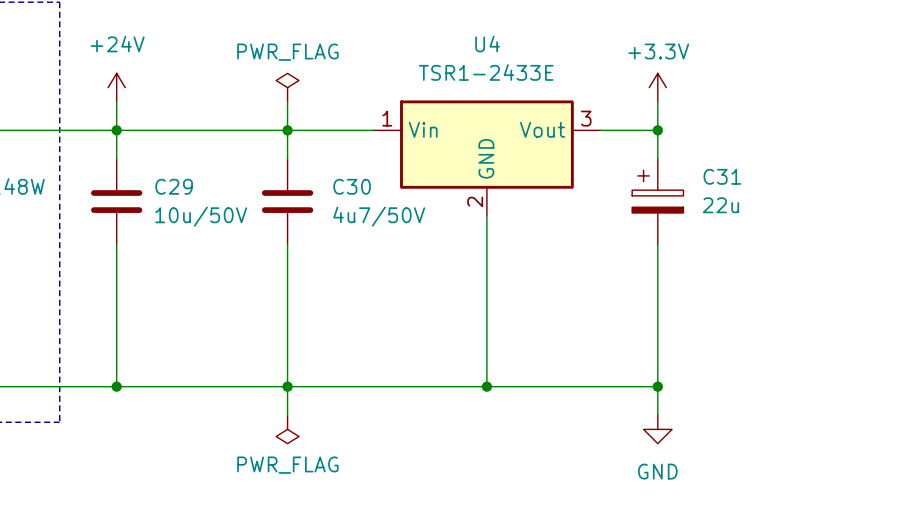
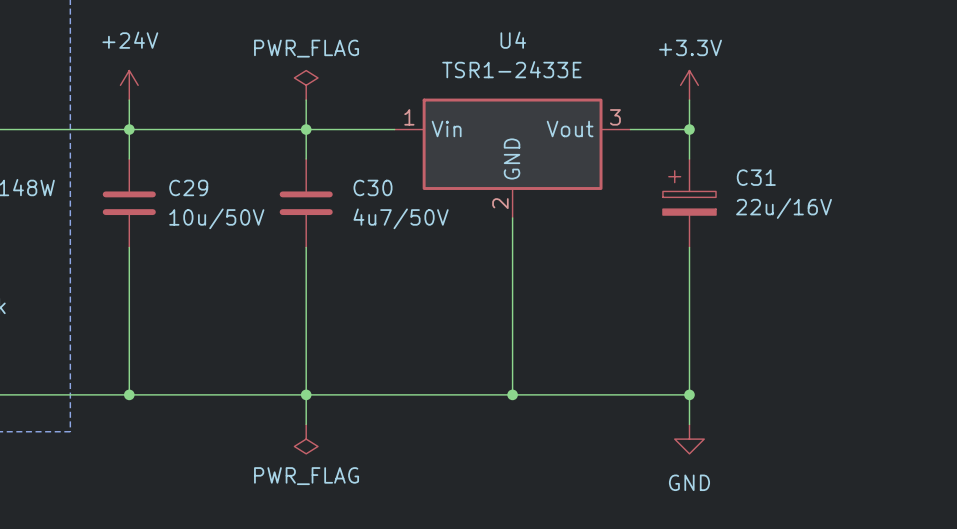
C31 value: 22u (720, 205) -> 22u/16V (784, 208)

